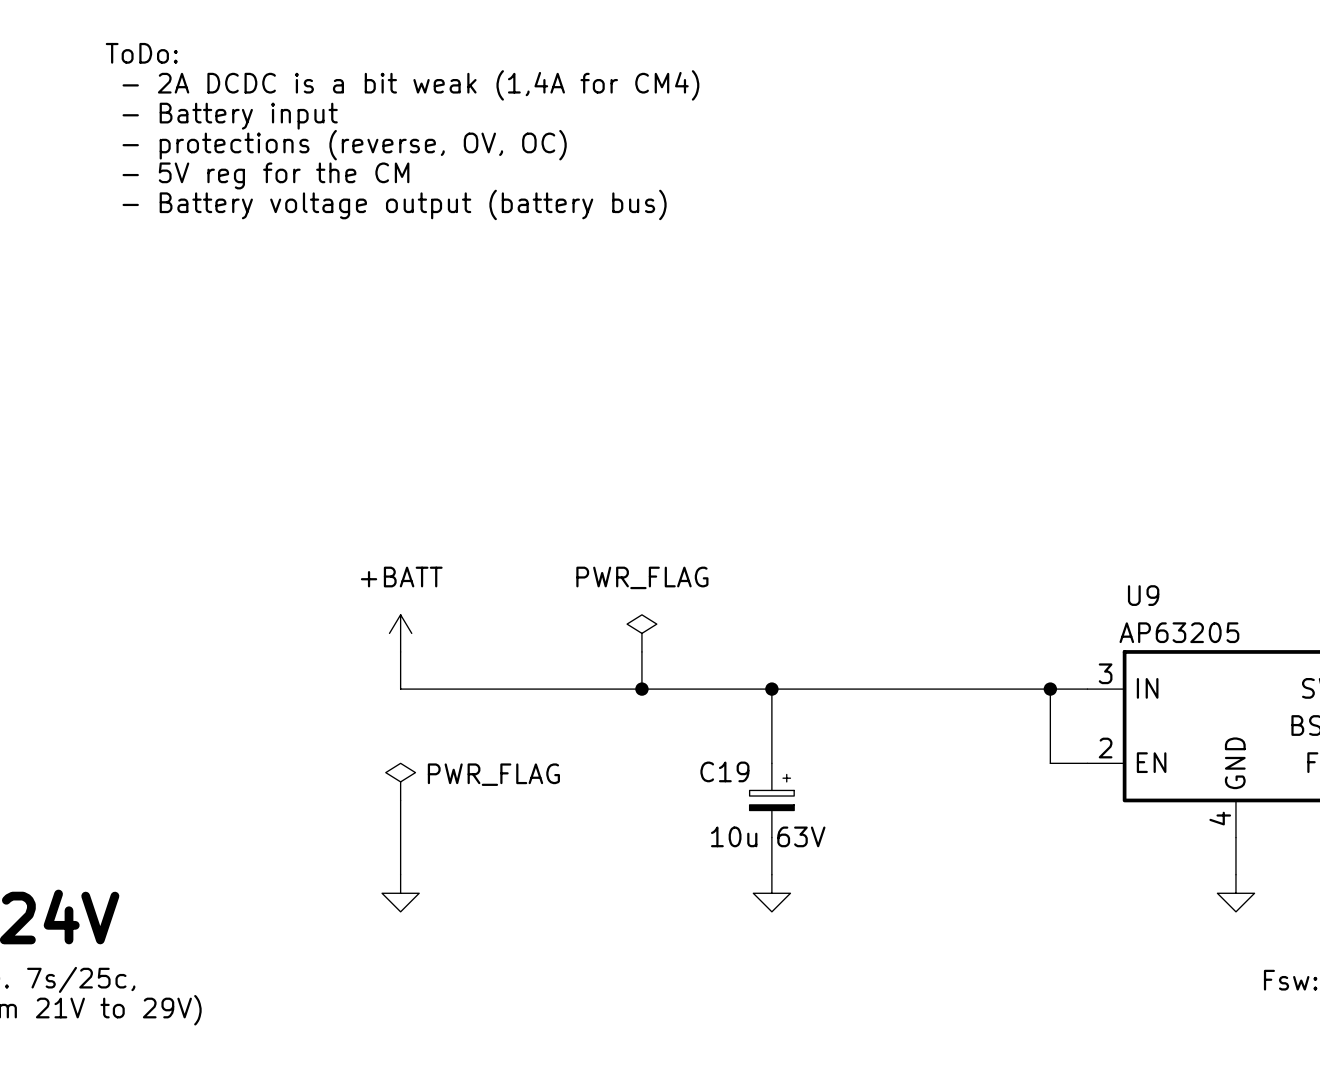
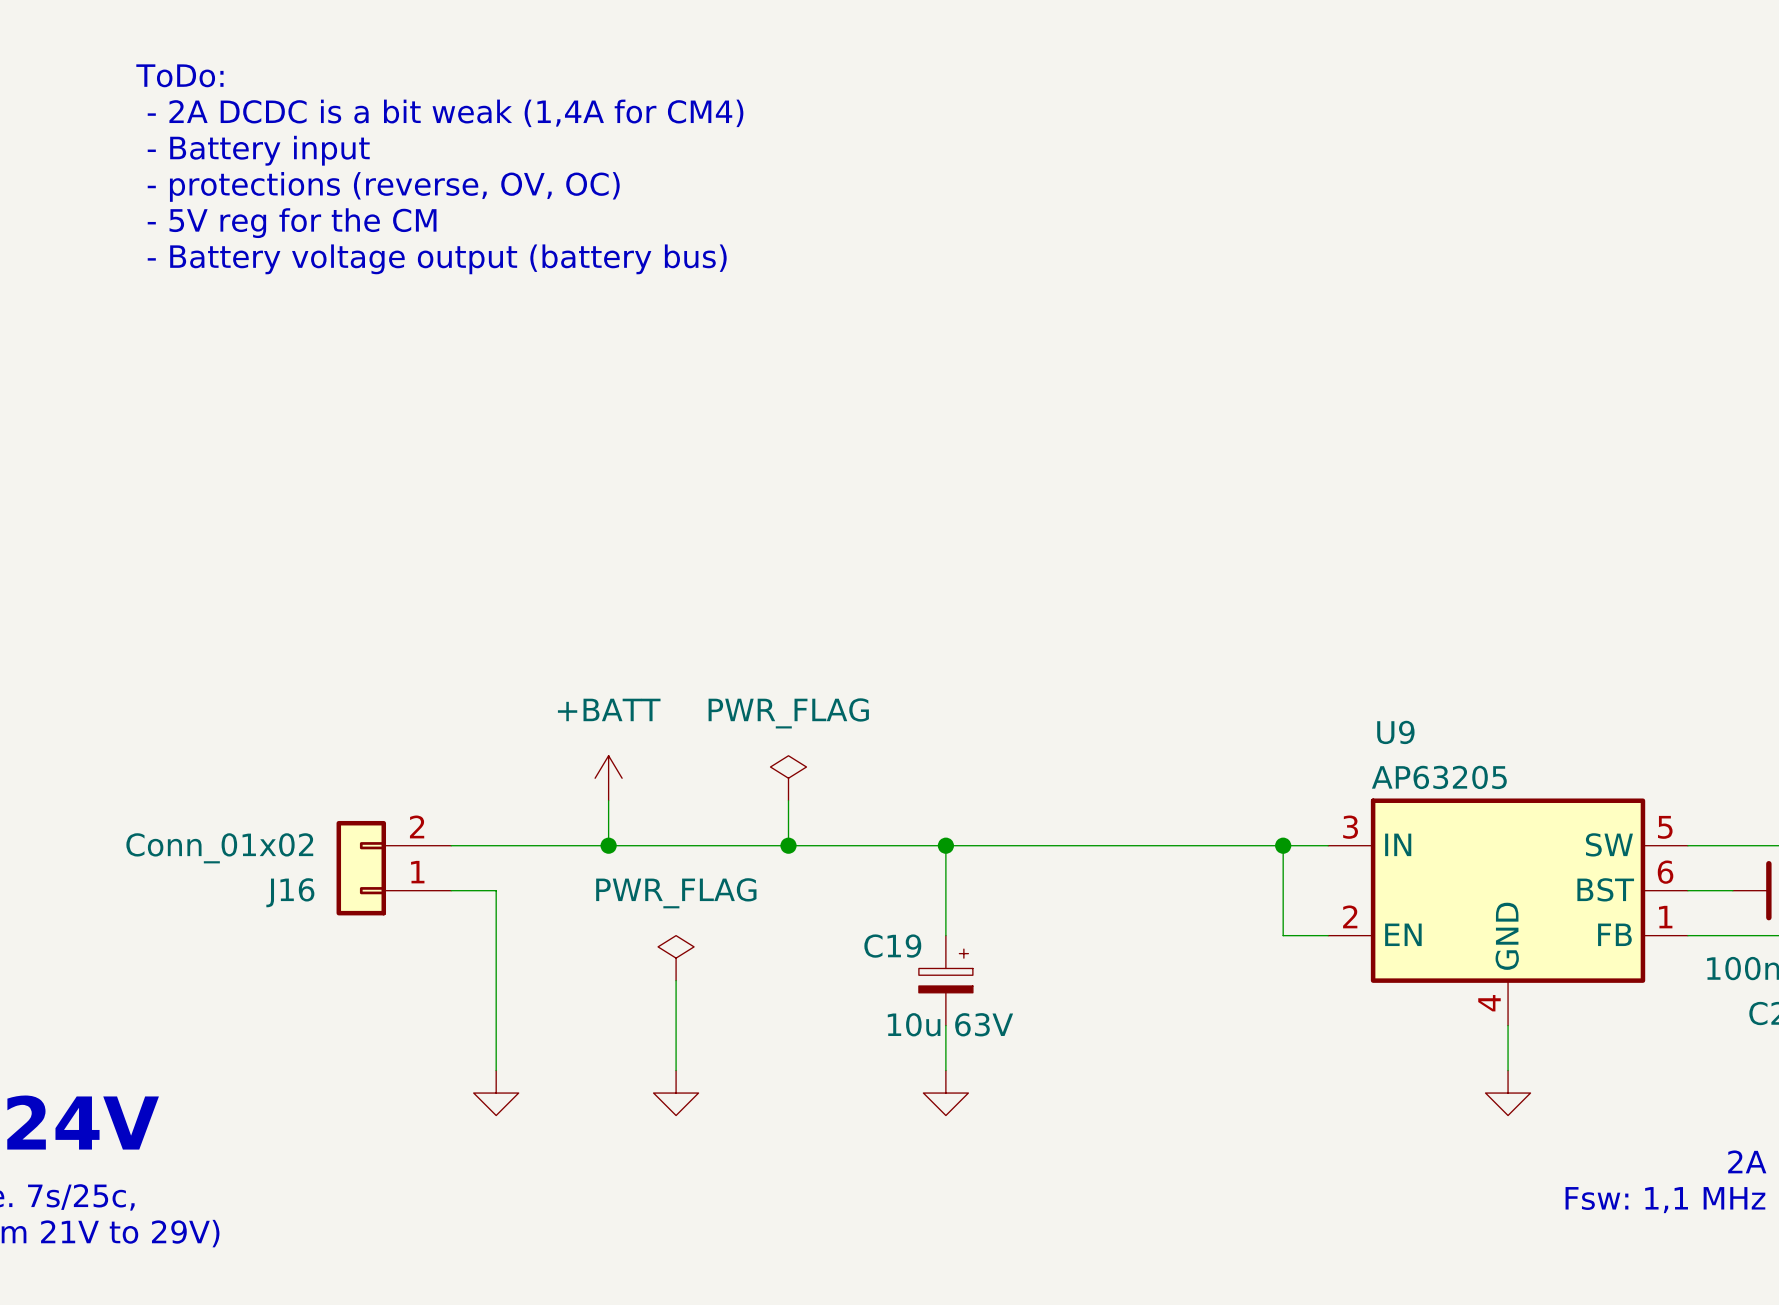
power symbol position: +BATT (400, 633) -> +BATT (608, 778)
wire: (400, 651) (400, 689) -> (451, 845) (496, 845)
wire: none -> (608, 800) (608, 845)
junction: none -> (608, 845)
J16: none -> Conn_01x02 (393, 868)
wire: none -> (451, 890) (496, 890) (496, 980)
power symbol text position: PWR_FLAG (493, 774) -> PWR_FLAG (676, 893)
power symbol position: PWR_FLAG (400, 781) -> PWR_FLAG (676, 958)
wire: none -> (676, 980) (676, 1070)
power symbol: none -> (676, 1093)

